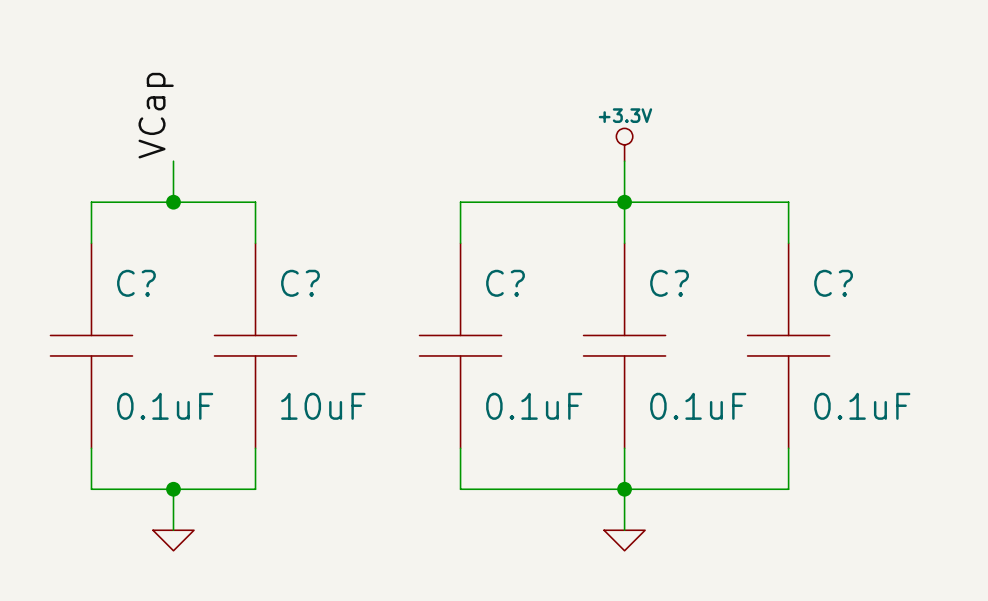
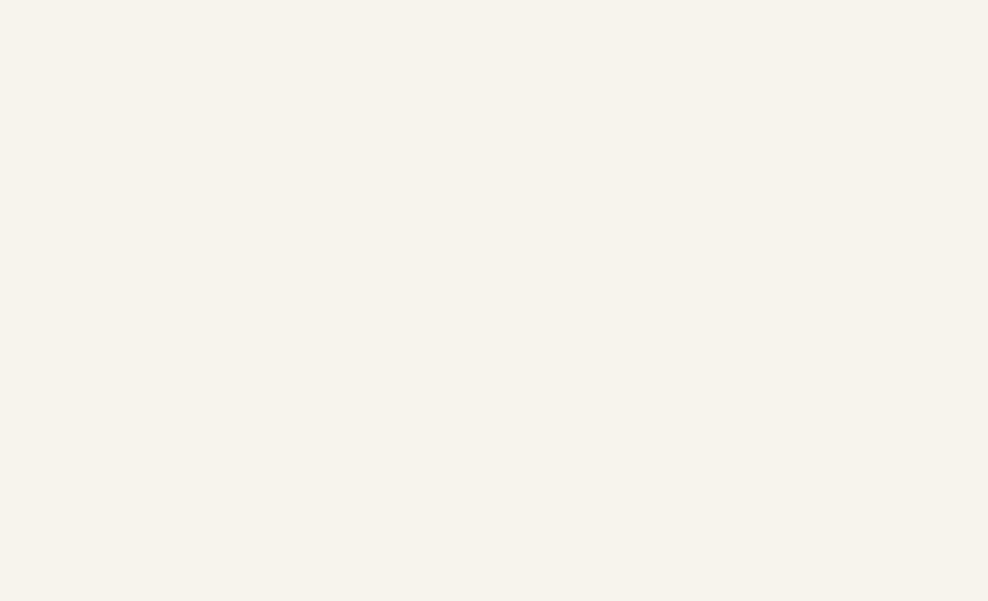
label: VCap (156, 115) -> none
power symbol: +3.3V (624, 144) -> none
wire: (173, 161) (173, 202) -> none
wire: (624, 161) (624, 243) -> none
junction: (173, 202) -> none
junction: (624, 202) -> none
wire: (91, 243) (91, 202) (255, 202) (255, 243) -> none
wire: (460, 243) (460, 202) (788, 202) (788, 243) -> none
C?: 0.1uF (91, 345) -> none
C?: 10uF (255, 345) -> none
C?: 0.1uF (460, 345) -> none
C?: 0.1uF (624, 345) -> none
C?: 0.1uF (788, 345) -> none
wire: (91, 448) (91, 489) (255, 489) (255, 448) -> none
wire: (460, 448) (460, 489) (788, 489) (788, 448) -> none
wire: (624, 448) (624, 530) -> none
wire: (173, 489) (173, 530) -> none
junction: (173, 489) -> none
junction: (624, 489) -> none
power symbol: (173, 540) -> none
power symbol: (624, 540) -> none

